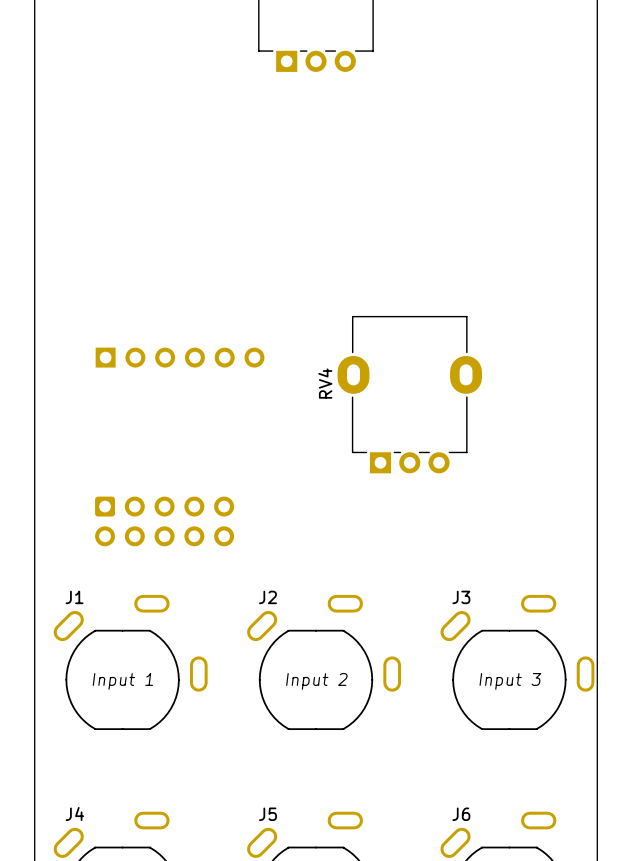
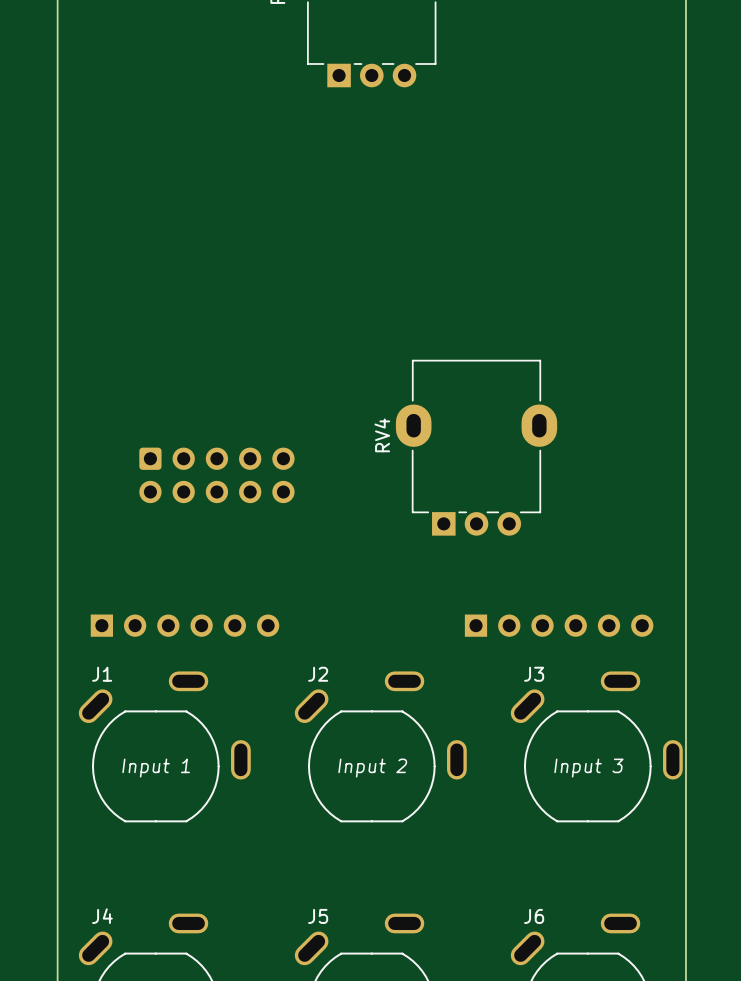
part: (180, 357) -> none
part position: (164, 521) -> (216, 475)
part: none -> (184, 625)
part: none -> (559, 625)

